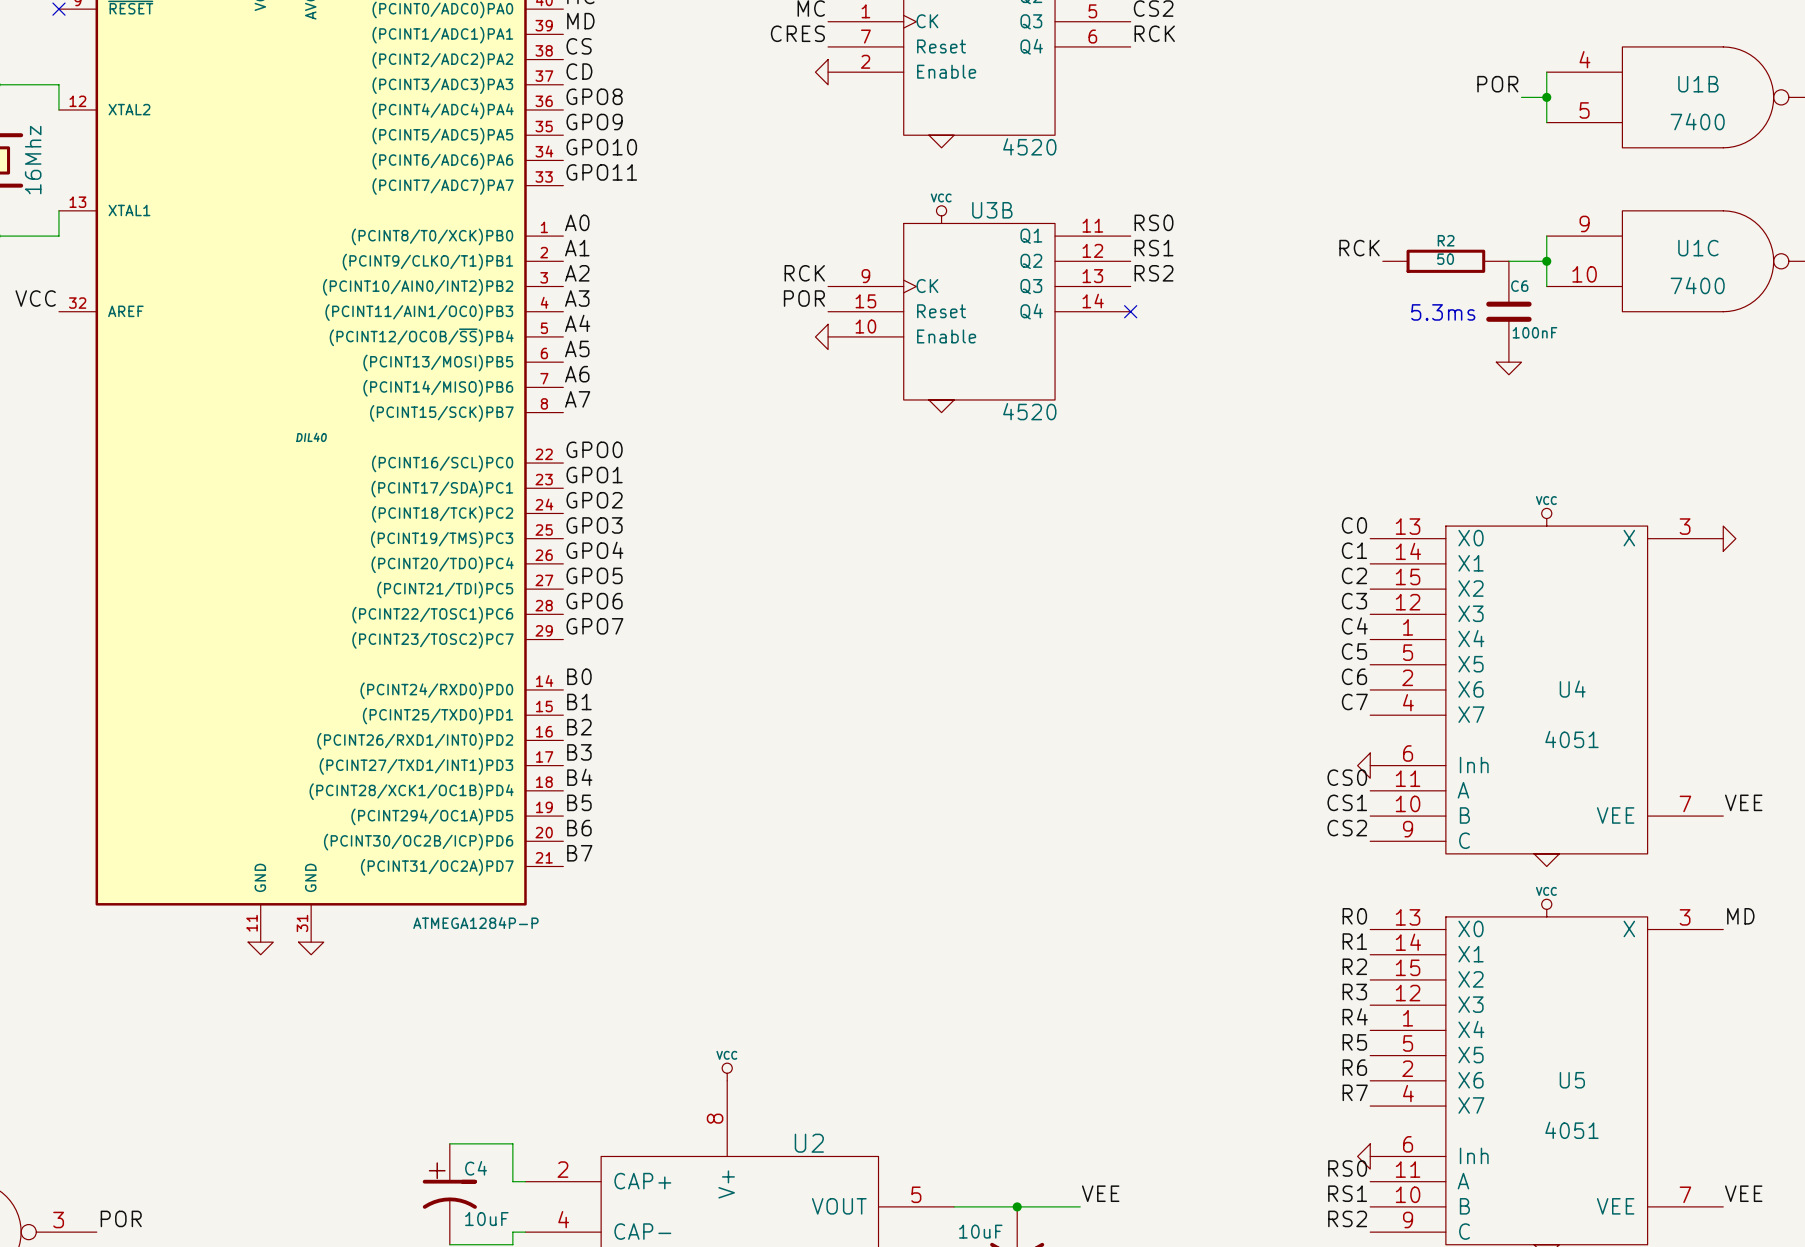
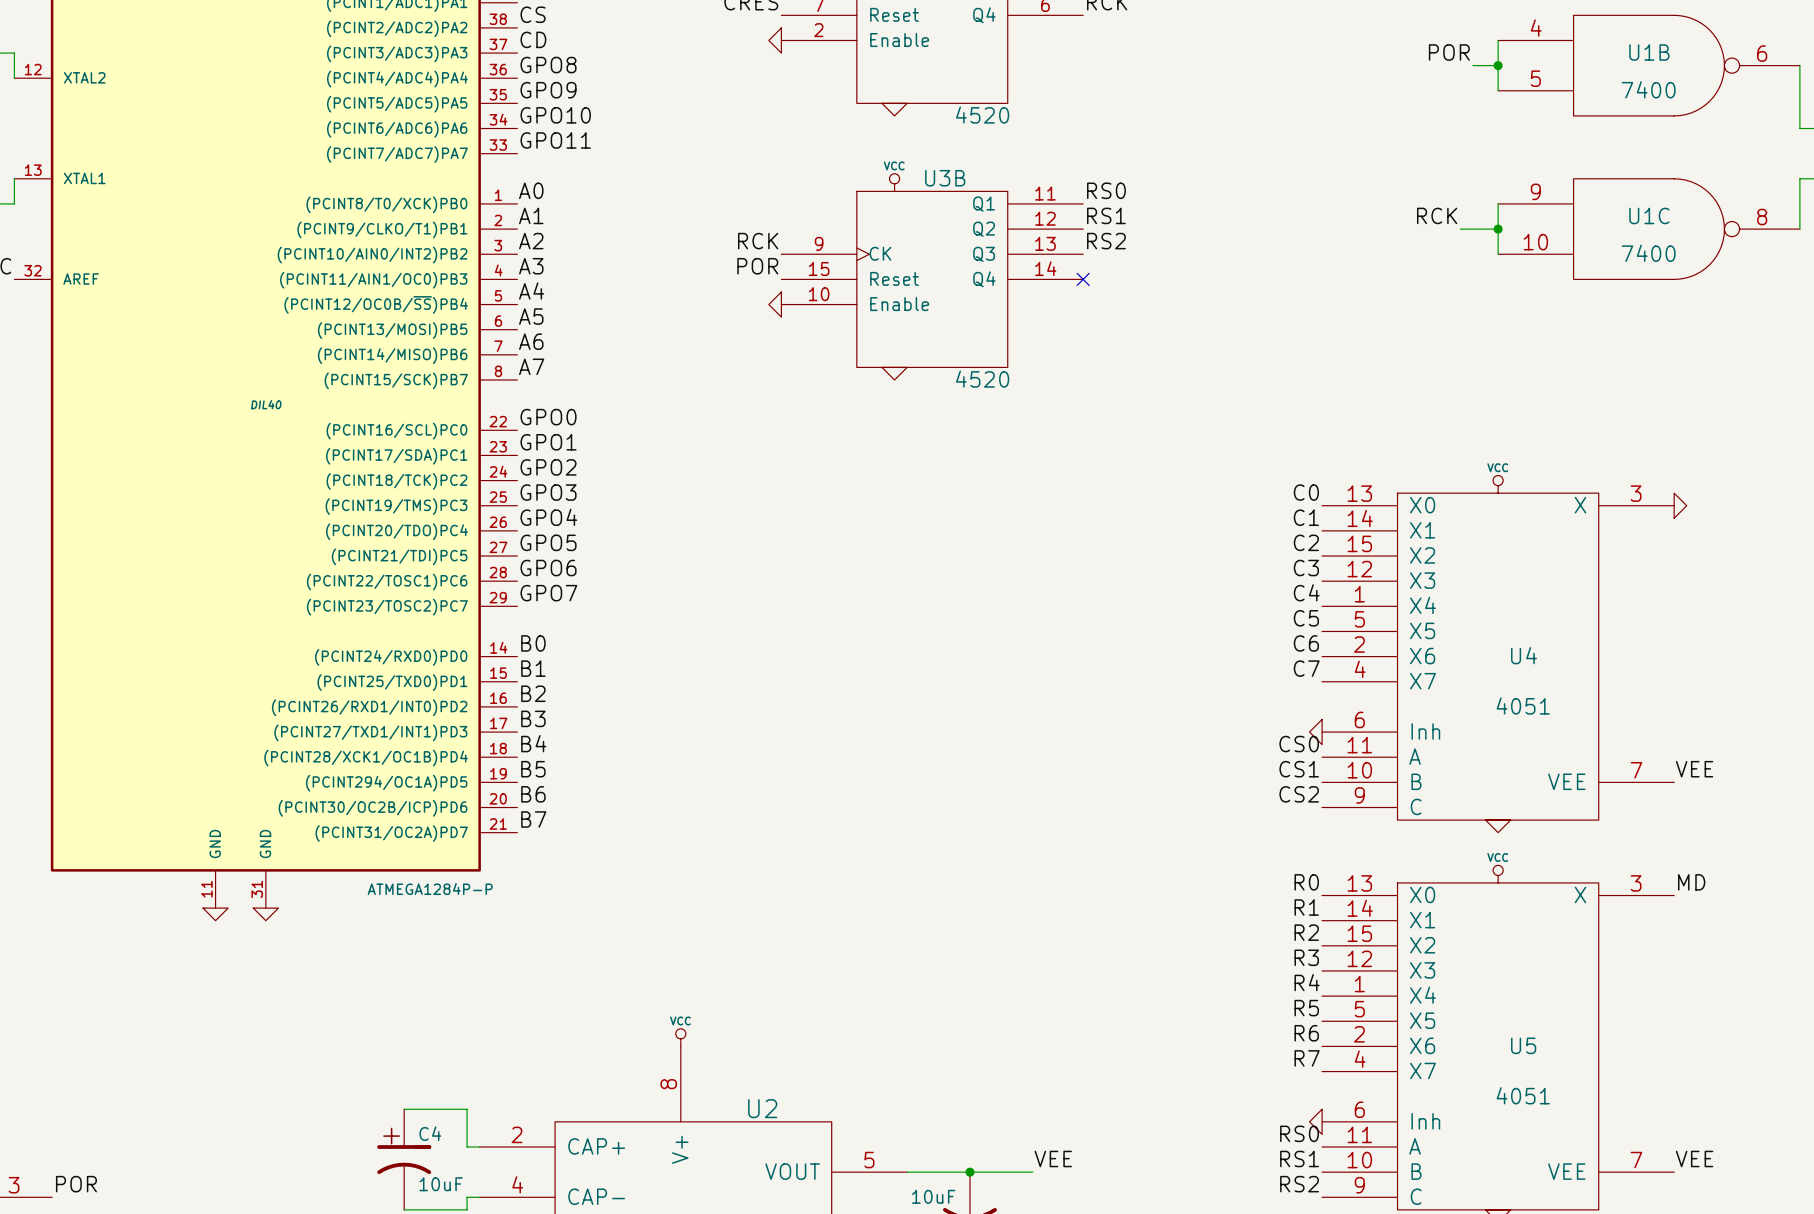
label position: RCK (1359, 248) -> RCK (1437, 215)
R2: 50 (1445, 261) -> none
C6: 100nF (1508, 311) -> none
text: 5.3ms (1443, 312) -> none
power symbol: (1508, 368) -> none

